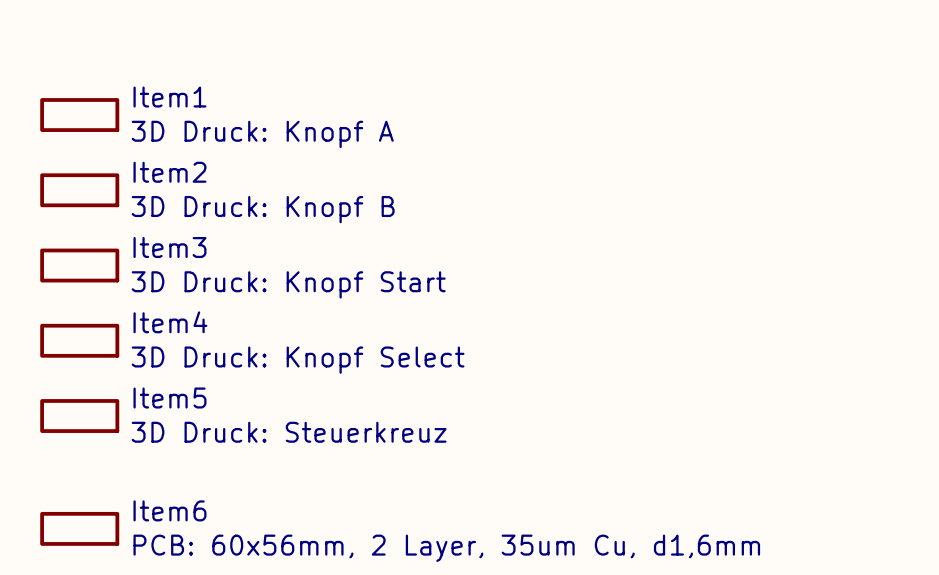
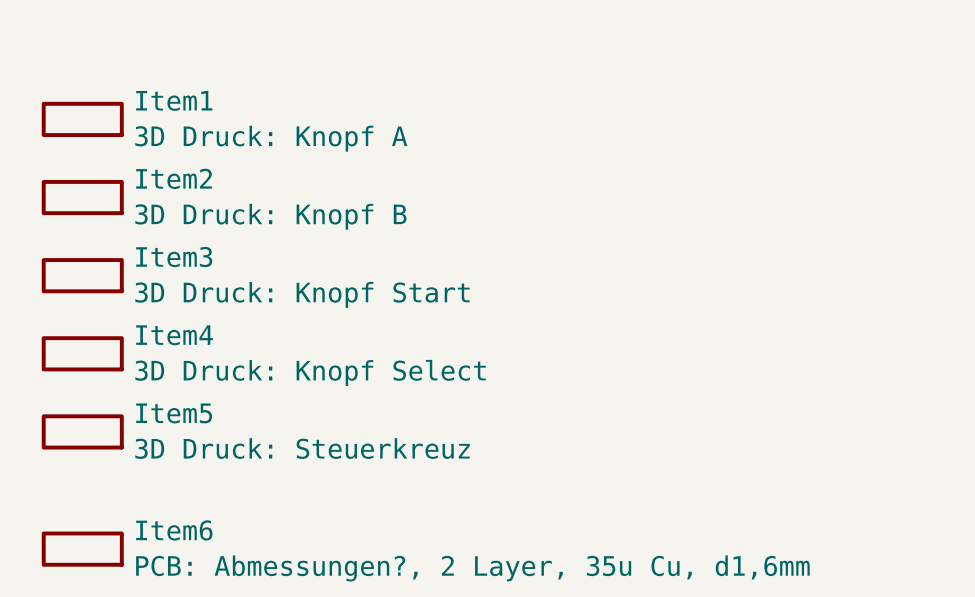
Item6 value: PCB: 60x56mm, 2 Layer, 35um Cu, d1,6mm (446, 548) -> PCB: Abmessungen?, 2 Layer, 35u Cu, d1,6mm (472, 568)

